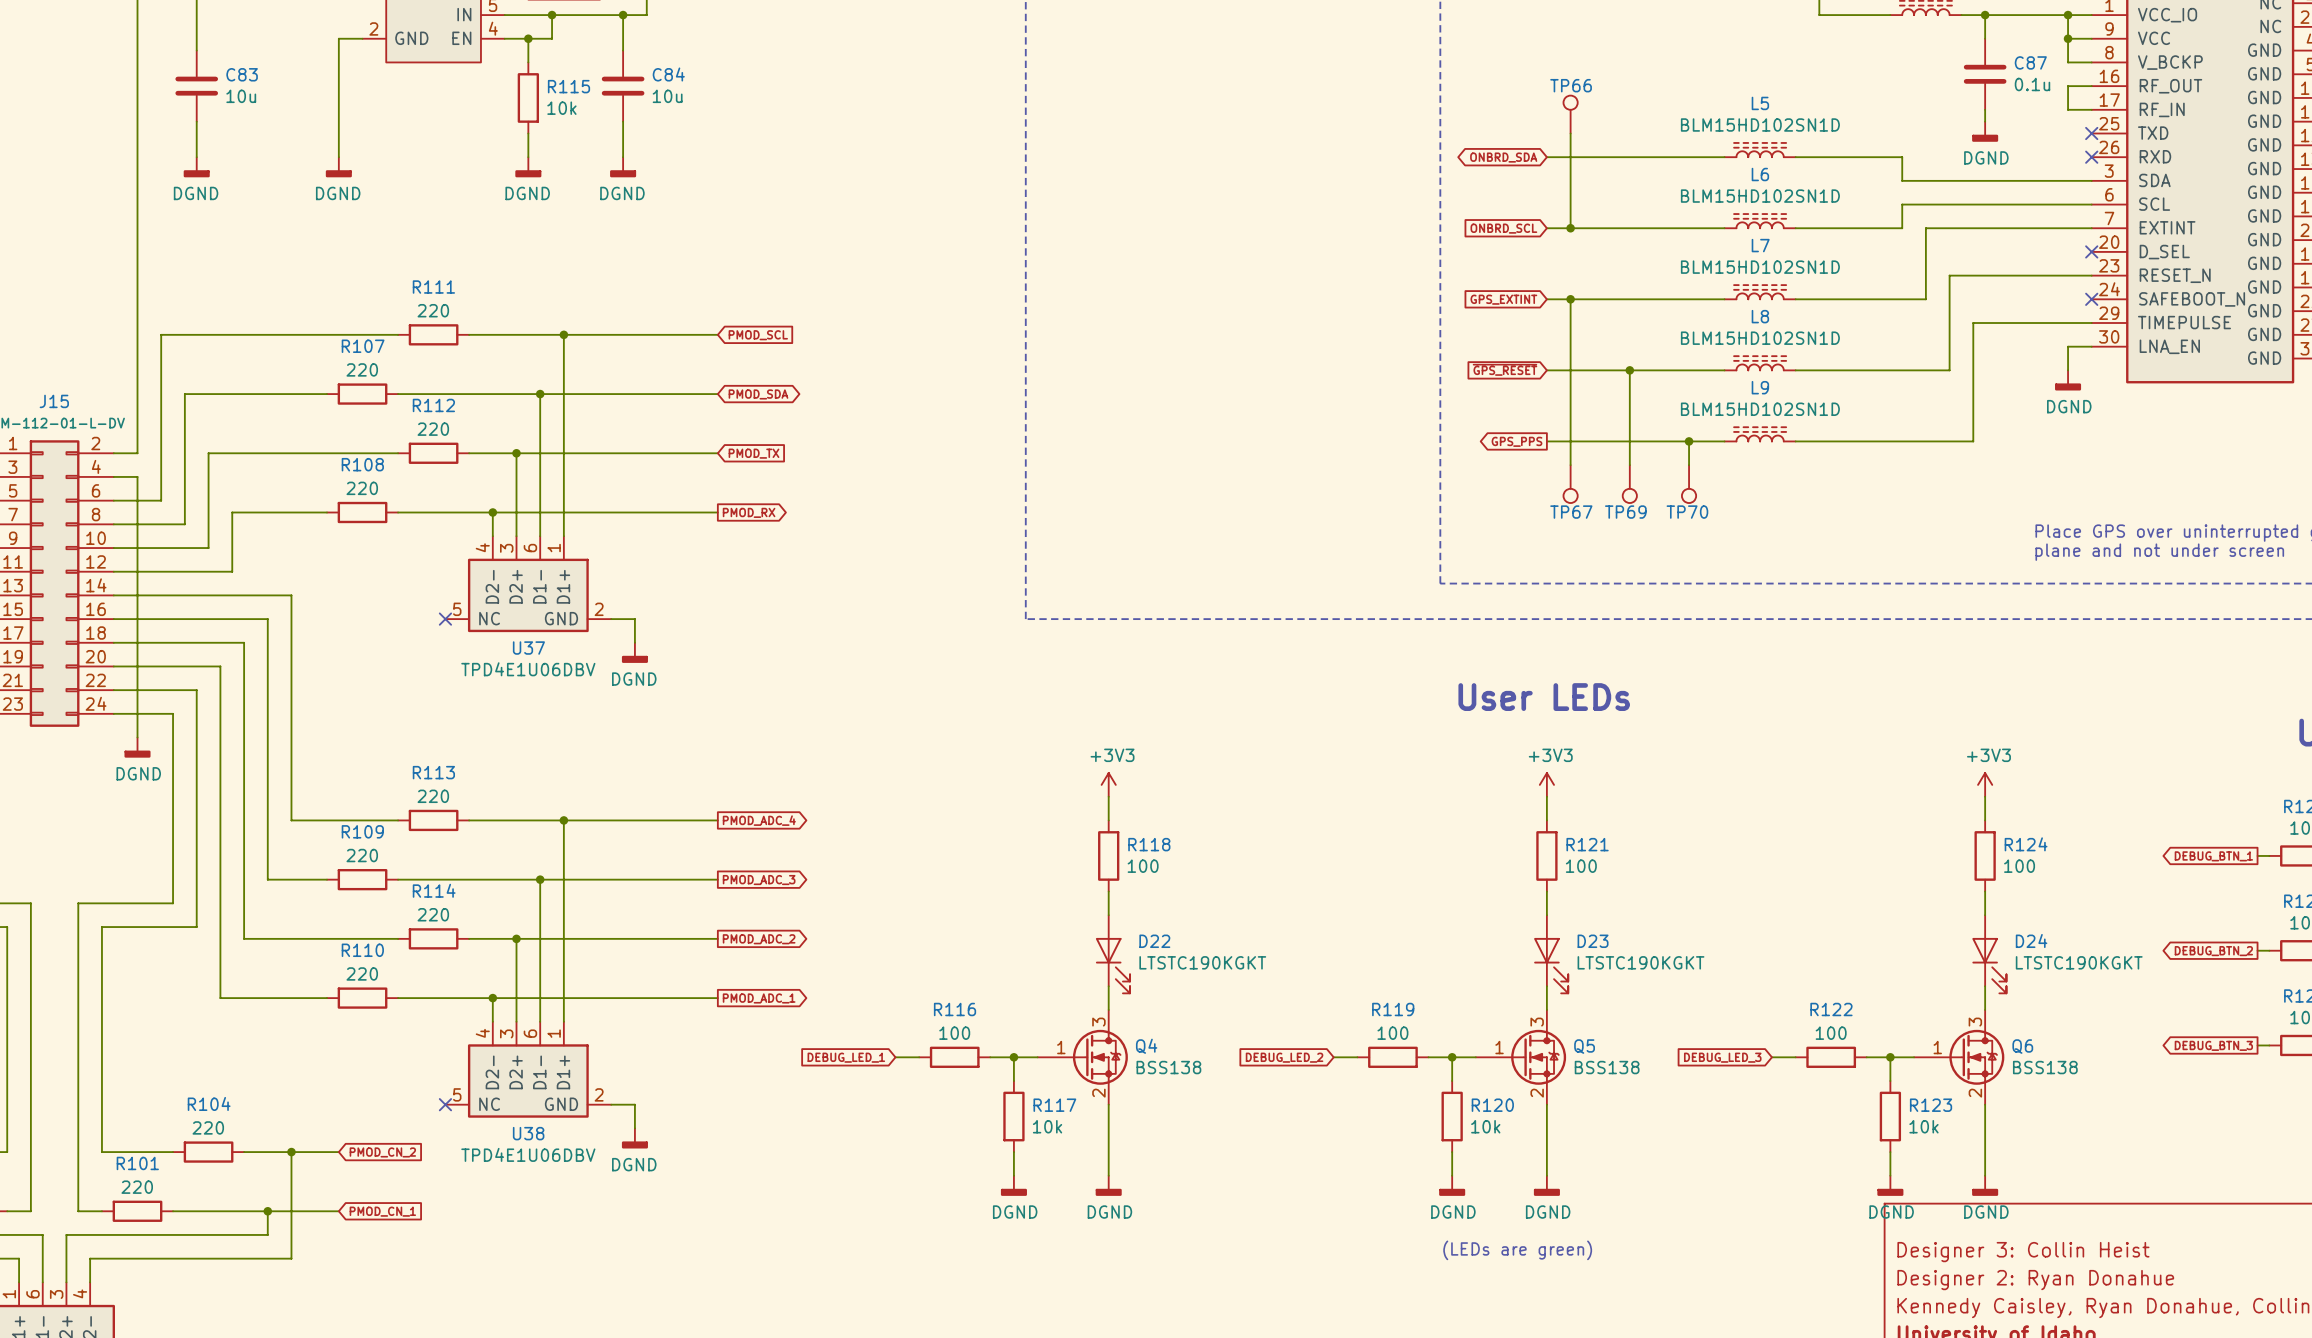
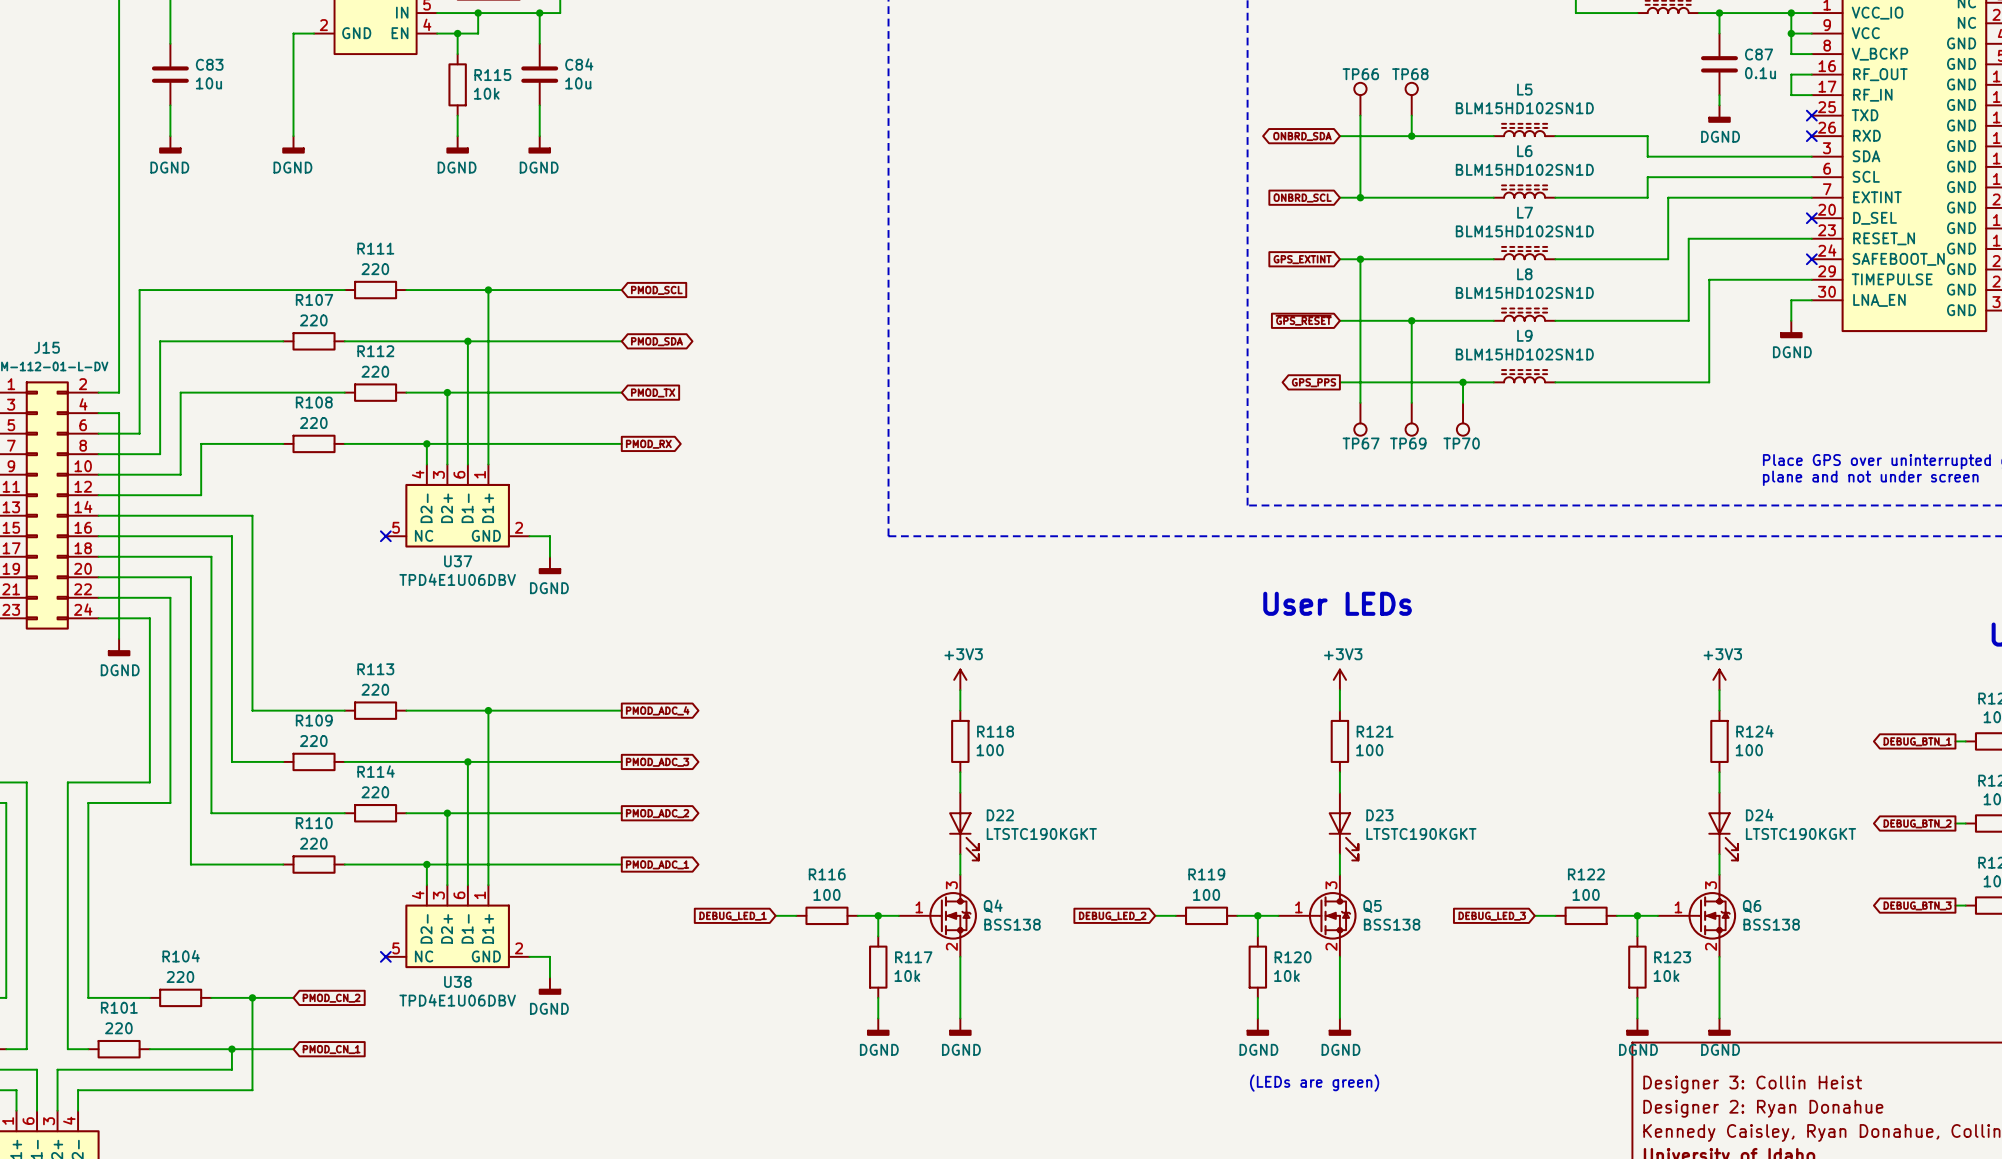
TP68: none -> (1411, 99)
wire: none -> (1411, 115) (1411, 136)
junction: none -> (1411, 136)

